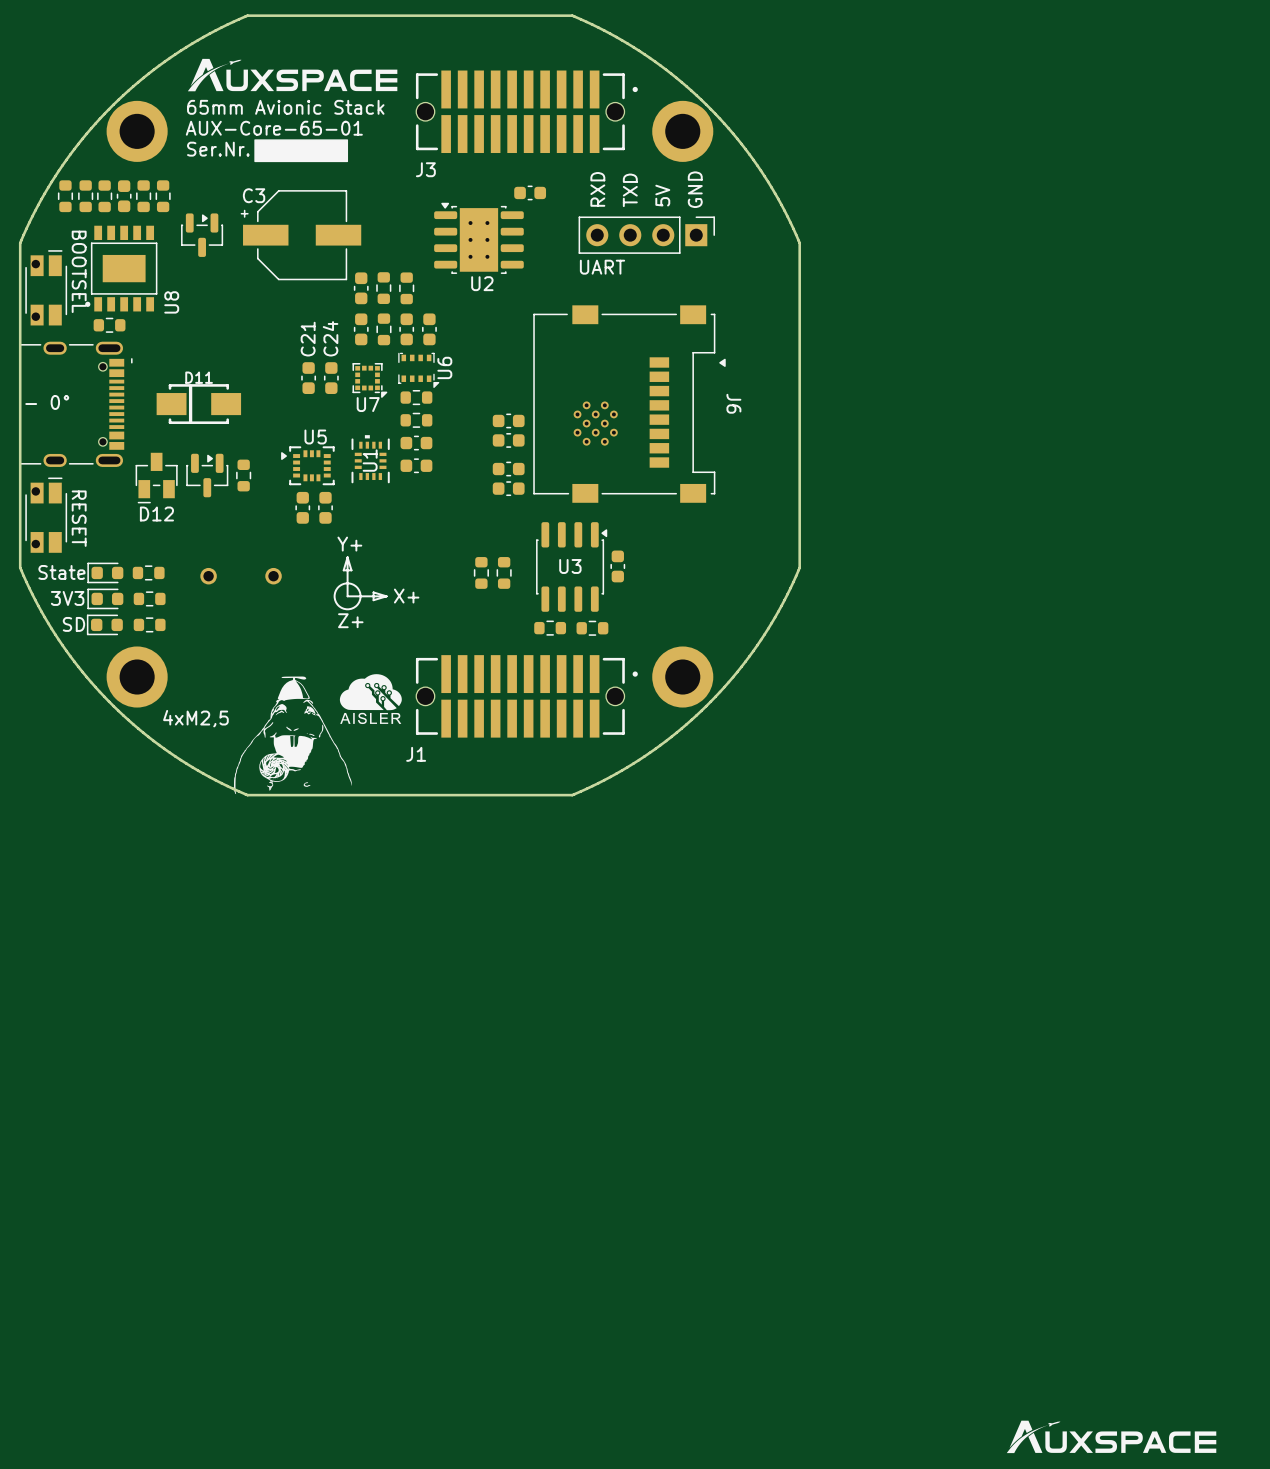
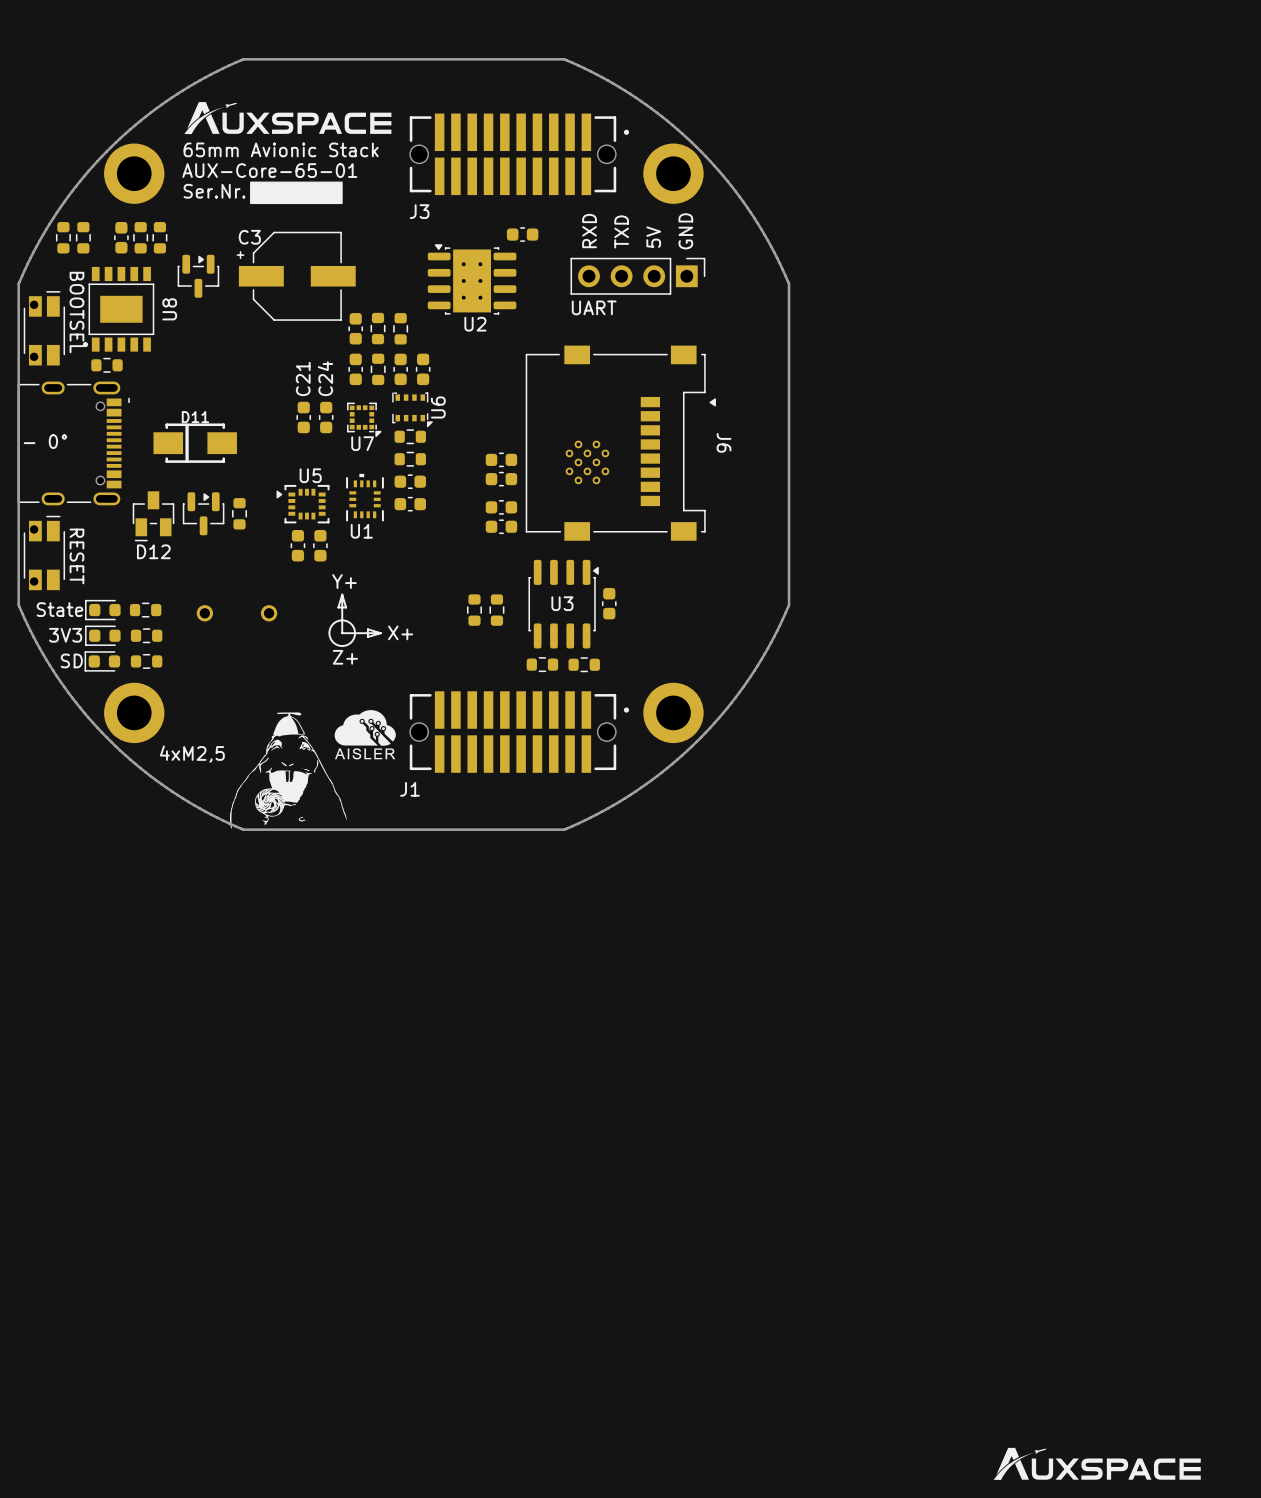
part: (104, 196) -> none
U8 name position: U8 (171, 302) -> U8 (169, 309)
U1 name rotation: 0° (370, 460) -> 90° clockwise (361, 531)
U1 name position: U1 (370, 460) -> U1 (361, 531)

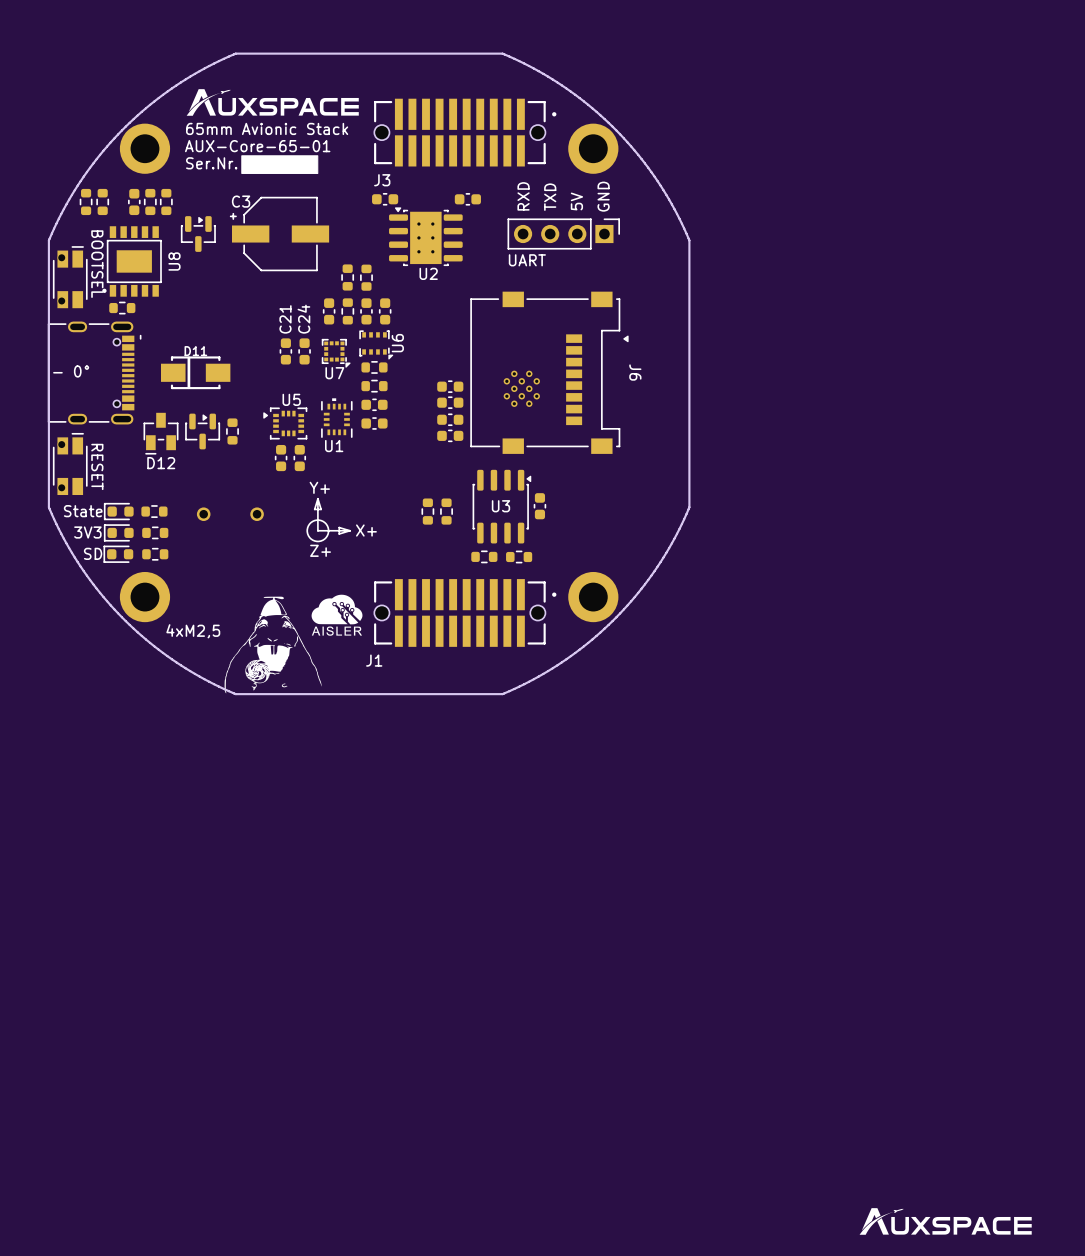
part: none -> (385, 199)
part: (355, 328) -> none
part: none -> (450, 419)
part: (501, 507) -> none
part: none -> (450, 435)
part: (501, 526) -> none

